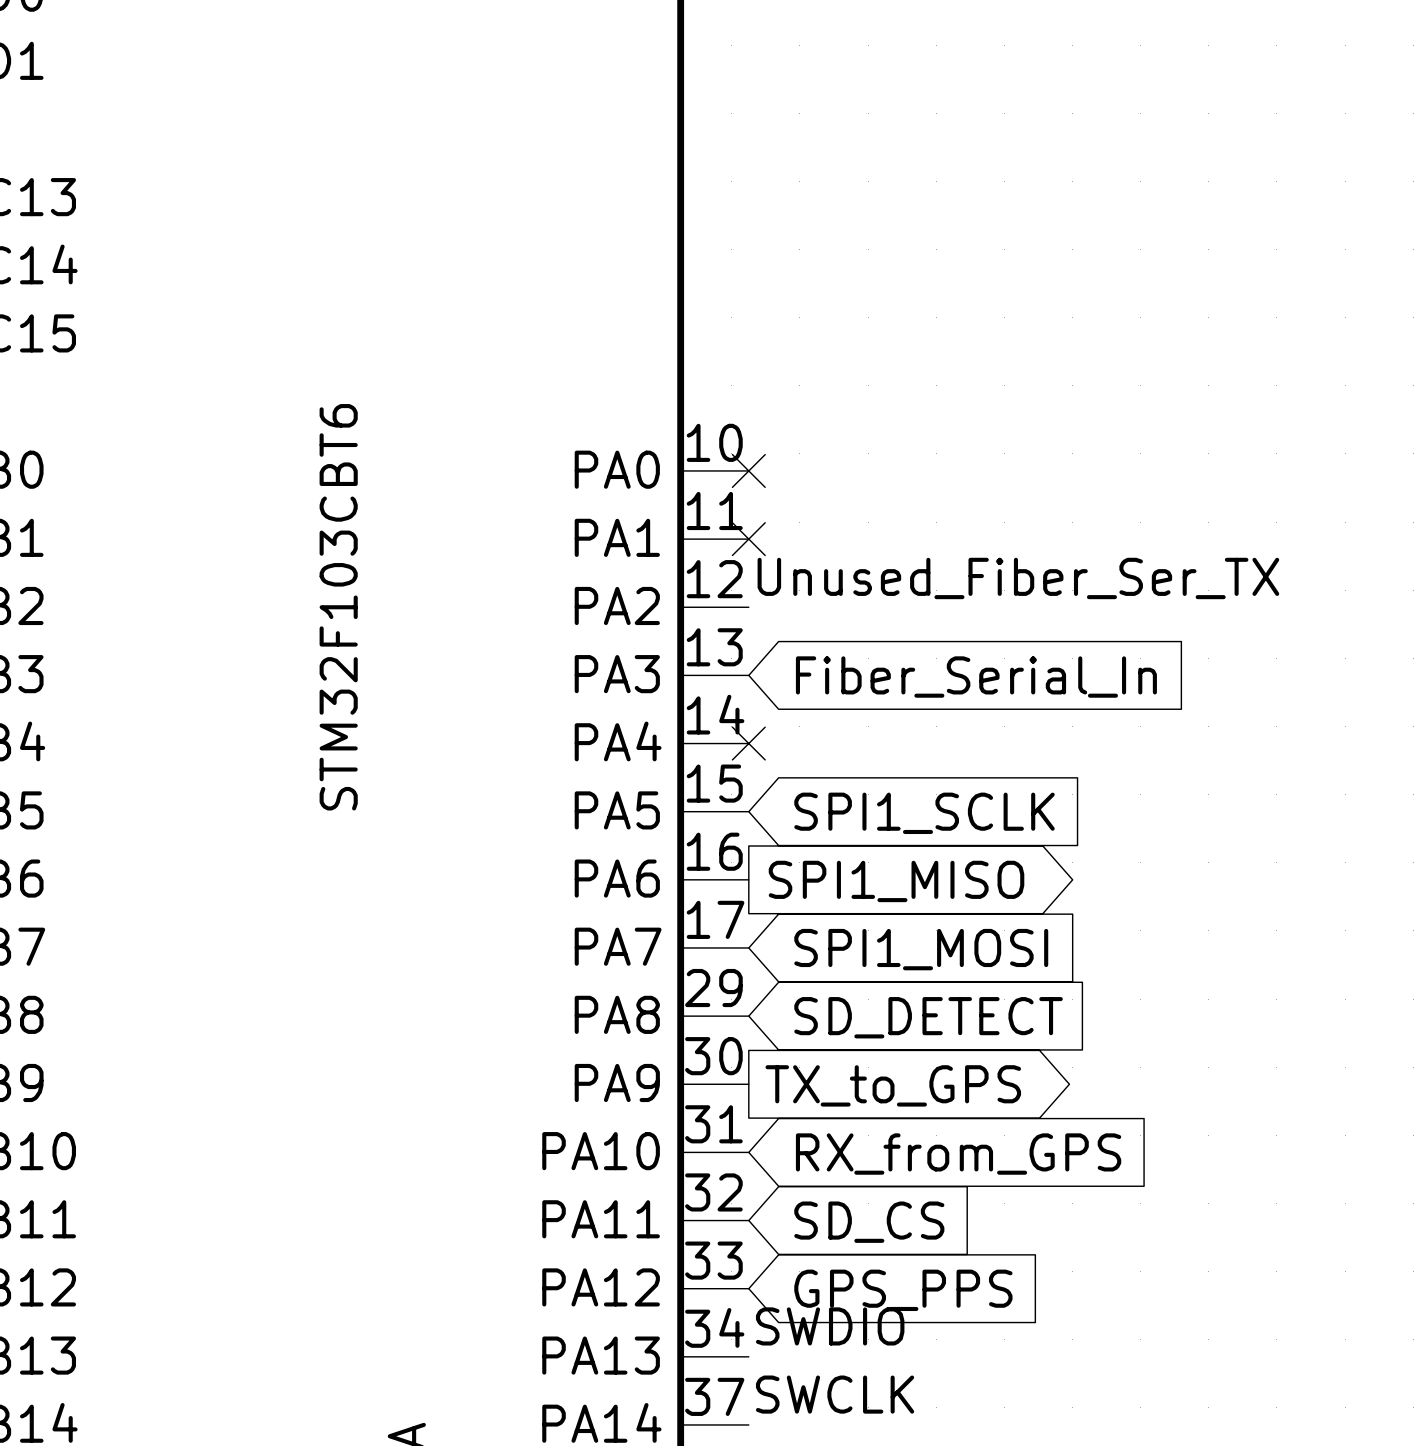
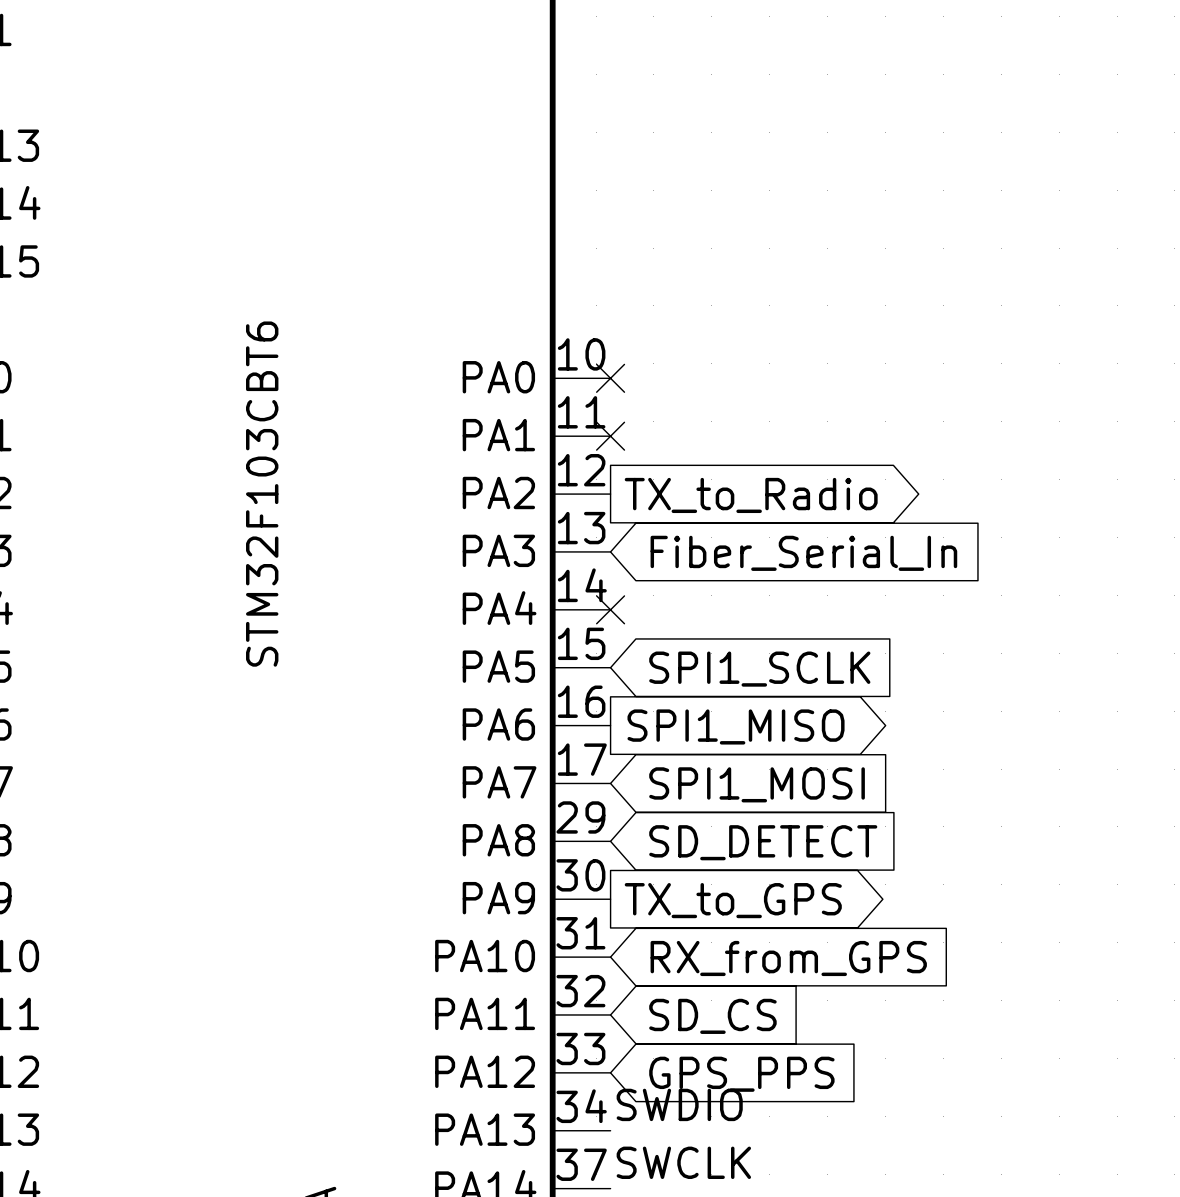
label: Unused_Fiber_Ser_TX (1018, 578) -> none
global label: none -> TX_to_Radio (751, 495)

